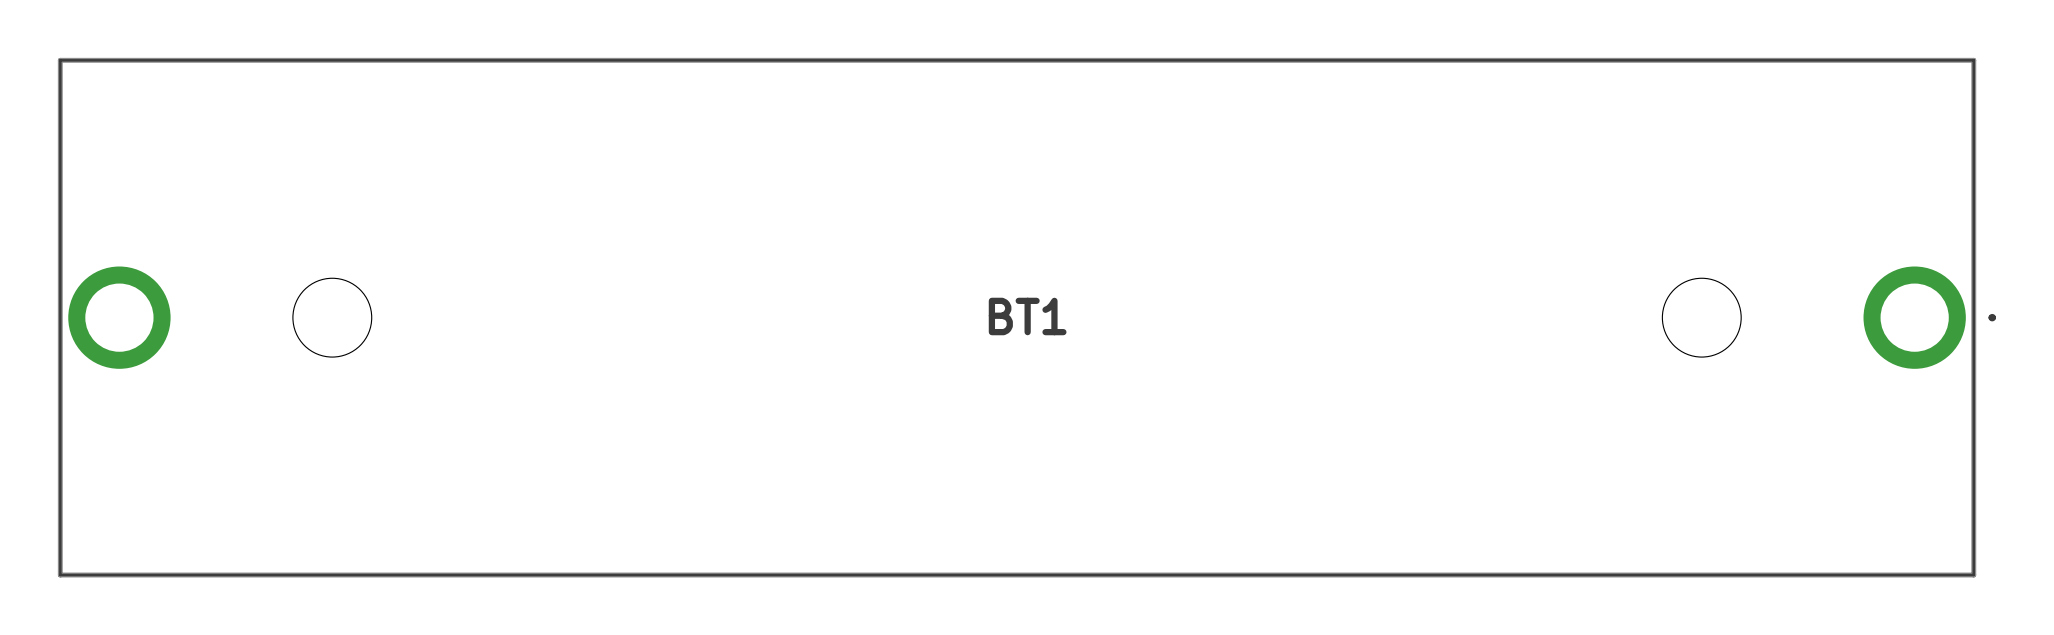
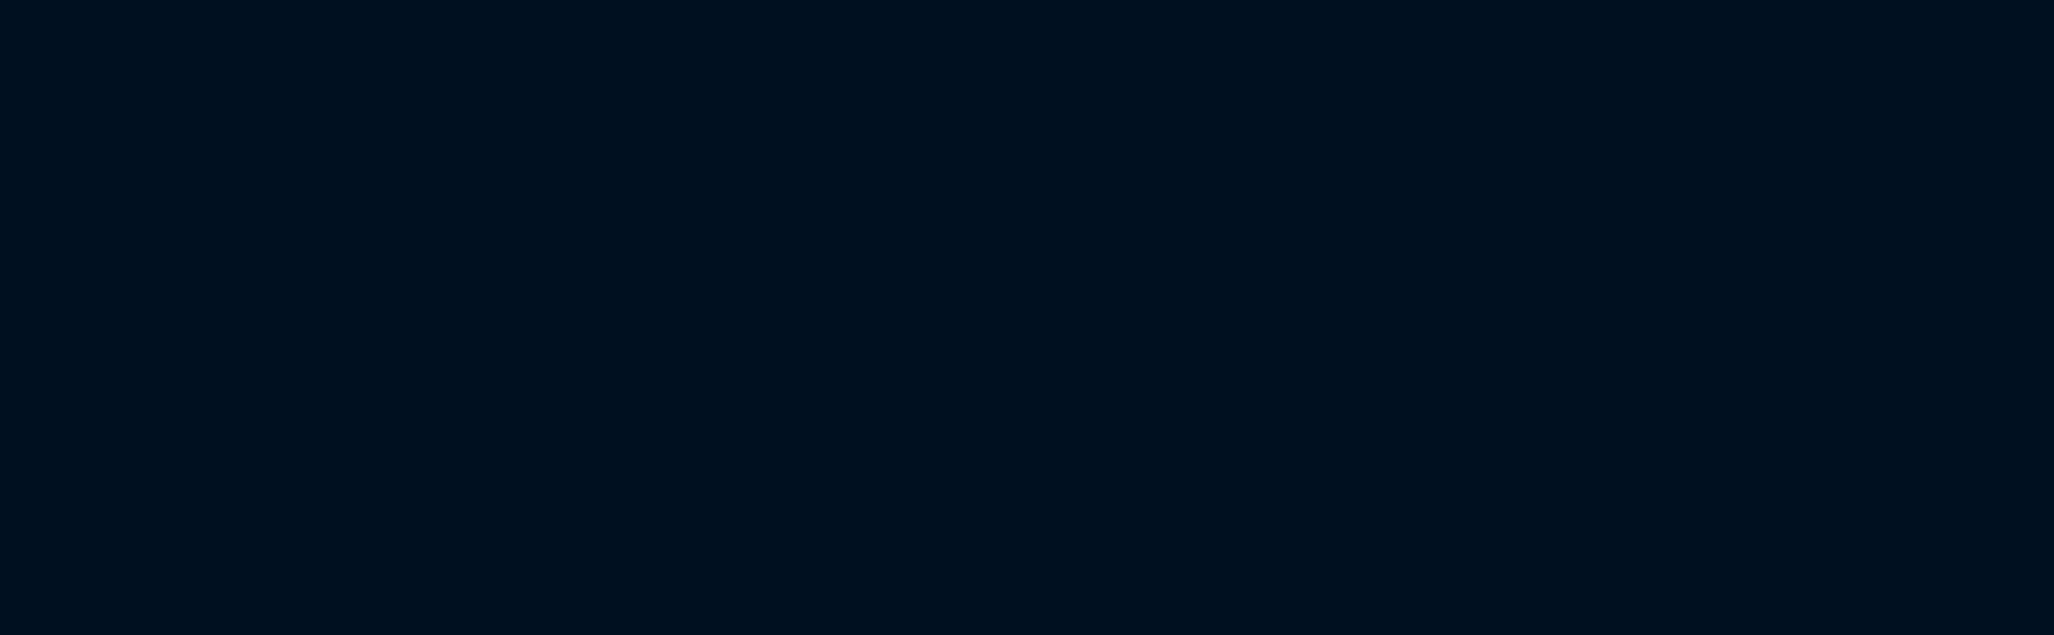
BT1: (1026, 317) -> none

